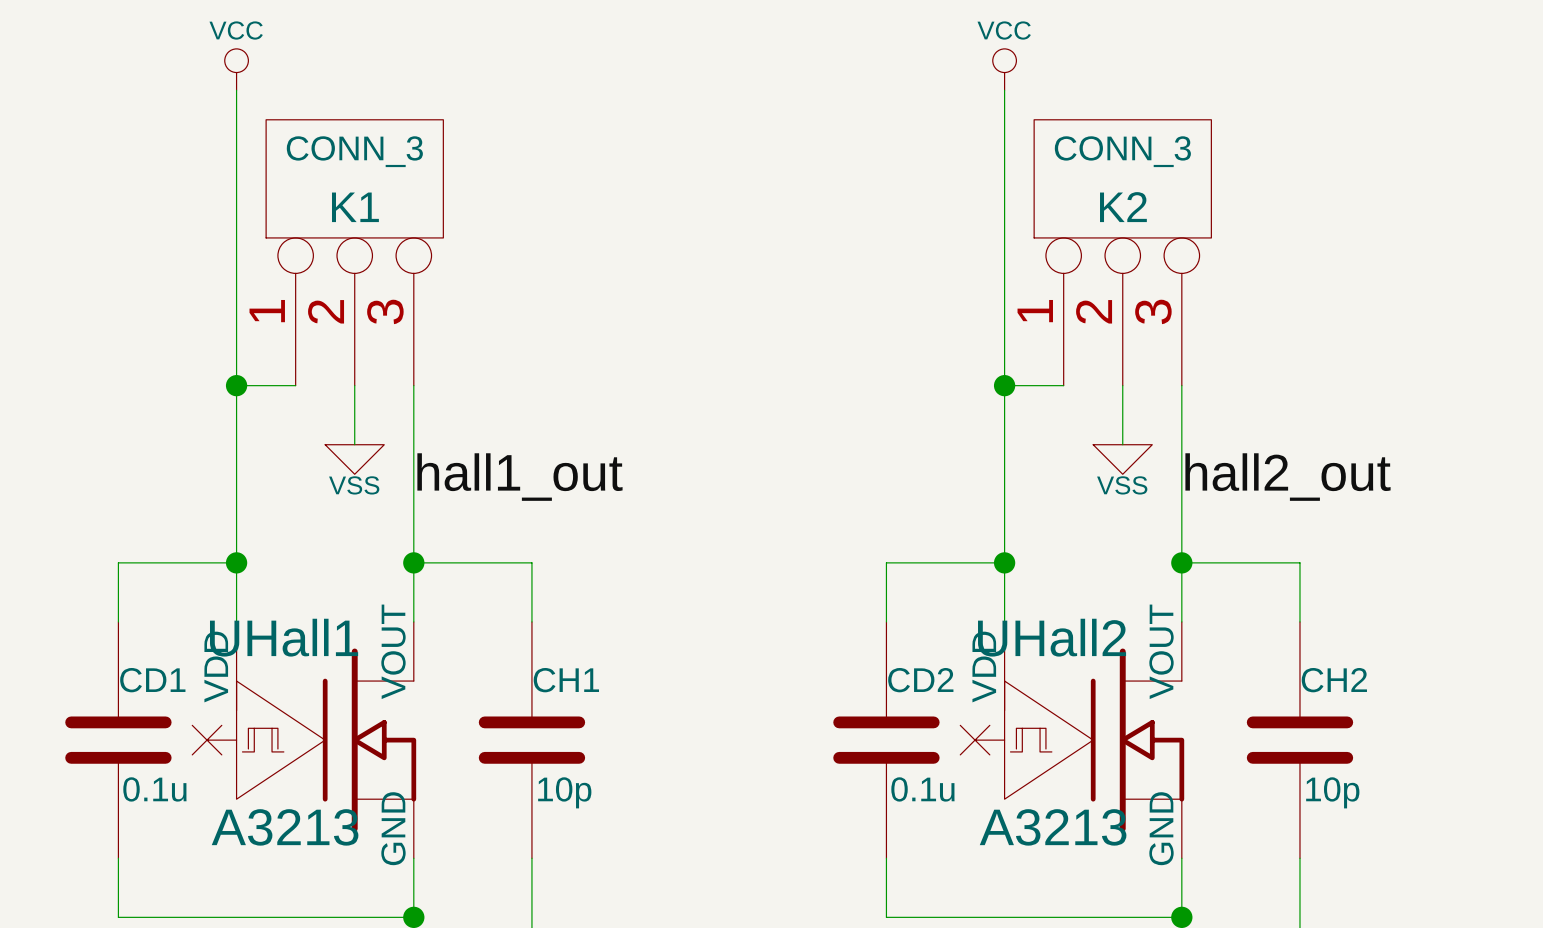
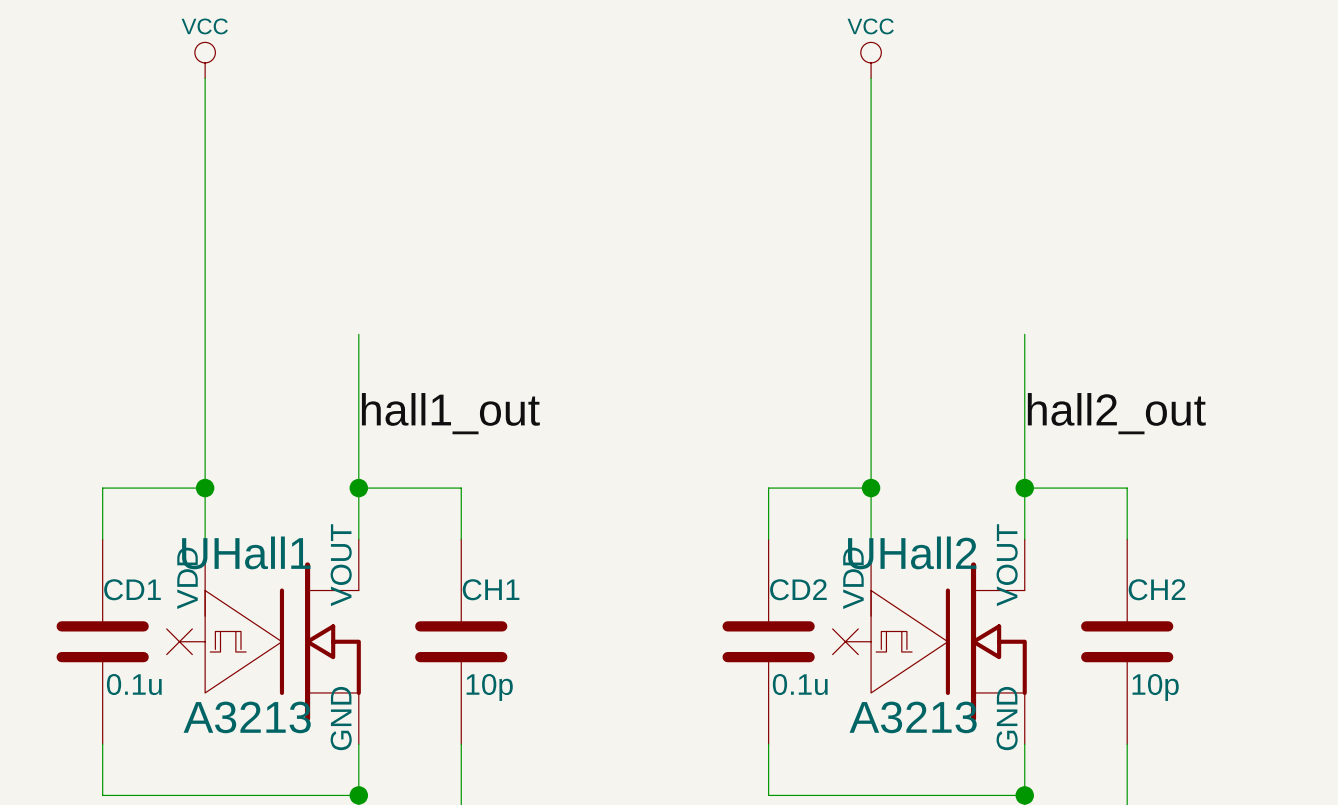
K1: CONN_3 (354, 252) -> none
K2: CONN_3 (1122, 252) -> none
wire: (236, 385) (295, 385) -> none
junction: (236, 385) -> none
wire: (354, 385) (354, 444) -> none
wire: (1004, 385) (1063, 385) -> none
junction: (1004, 385) -> none
wire: (1122, 385) (1122, 444) -> none
power symbol: VSS (354, 459) -> none
power symbol: VSS (1122, 459) -> none

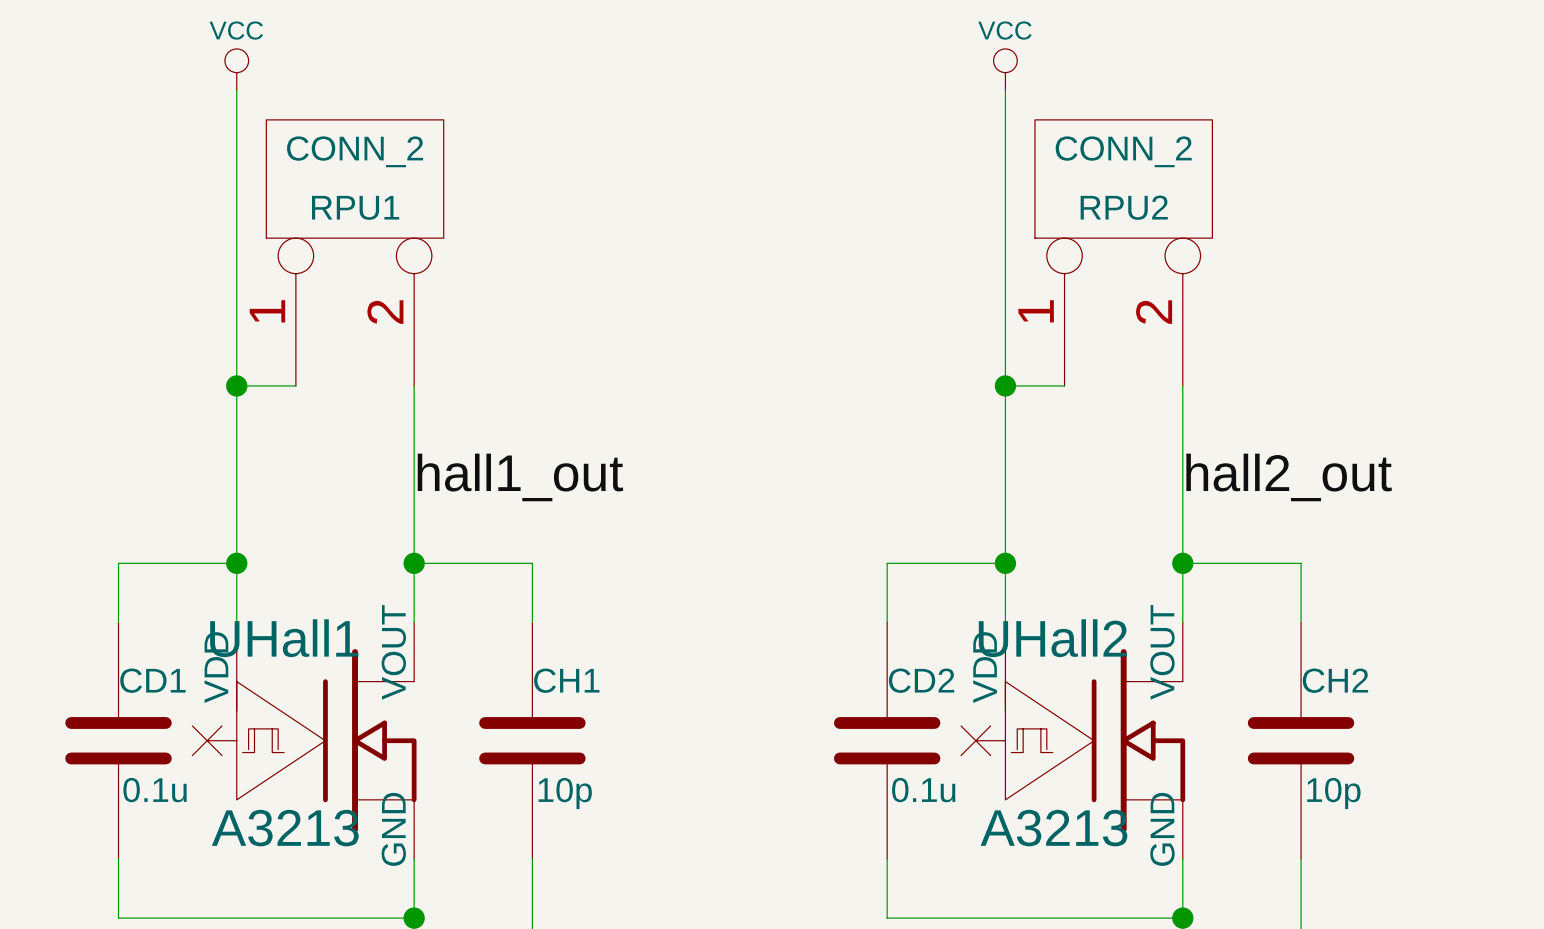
RPU1: none -> CONN_2 (355, 252)
RPU2: none -> CONN_2 (1123, 252)
wire: none -> (236, 385) (295, 385)
junction: none -> (236, 385)
wire: none -> (1005, 385) (1064, 385)
junction: none -> (1005, 385)

